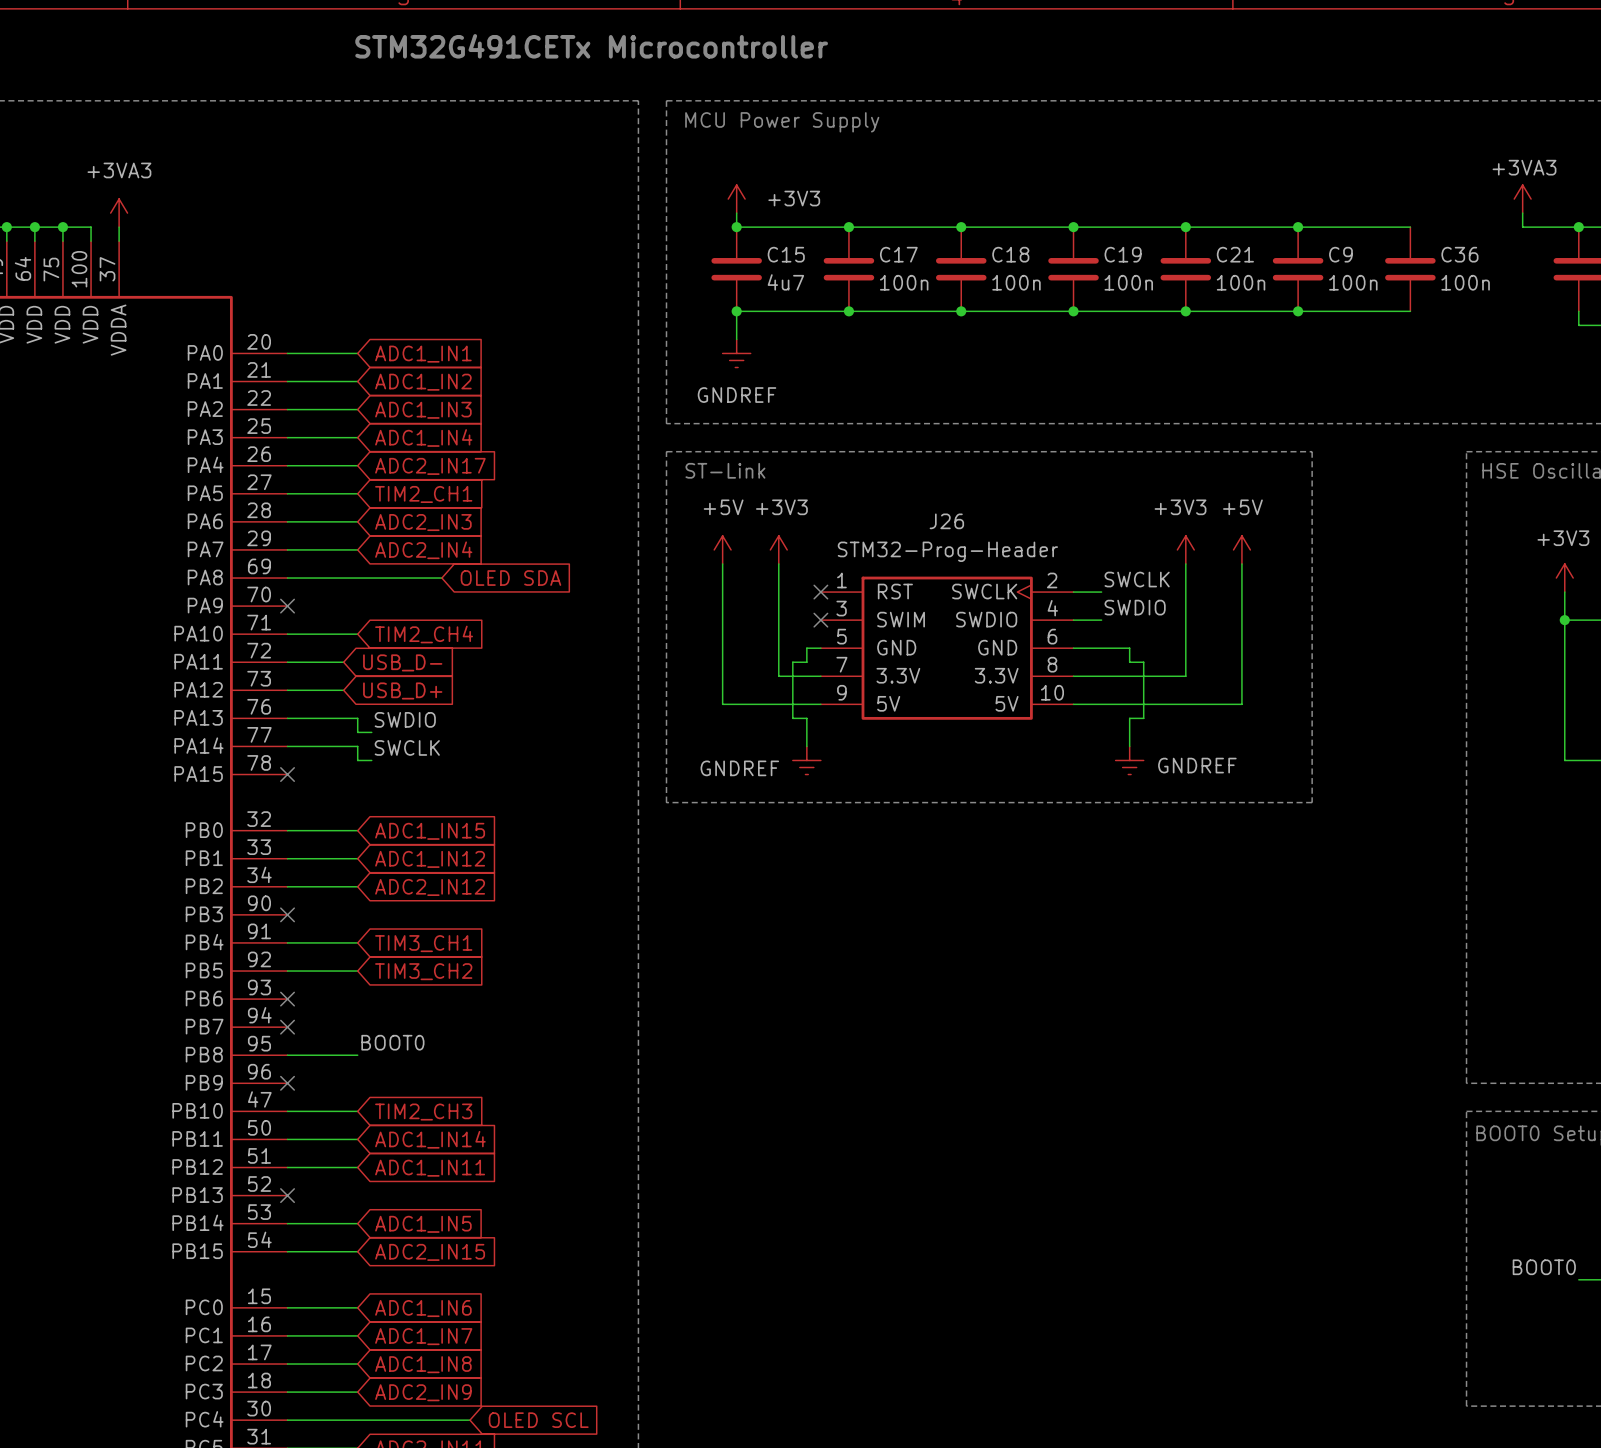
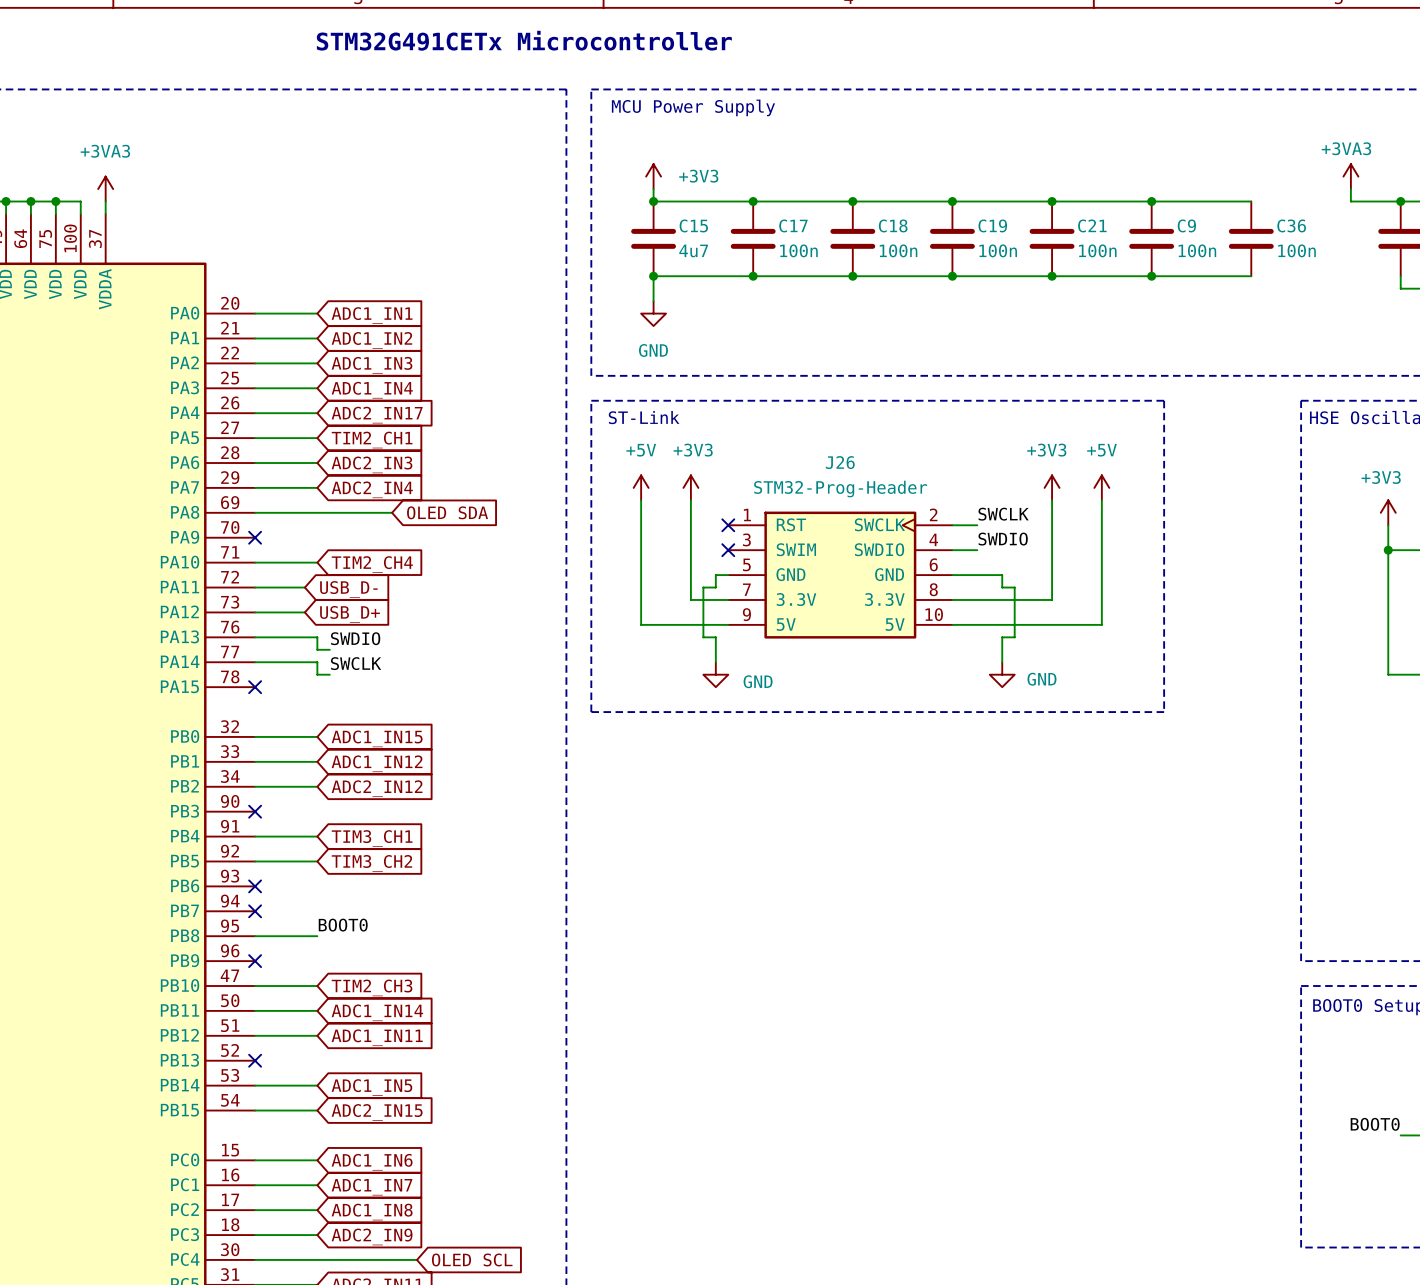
power symbol: GNDREF (736, 353) -> GND (653, 313)
power symbol: GNDREF (806, 760) -> GND (715, 674)
power symbol: GNDREF (1129, 760) -> GND (1002, 674)

